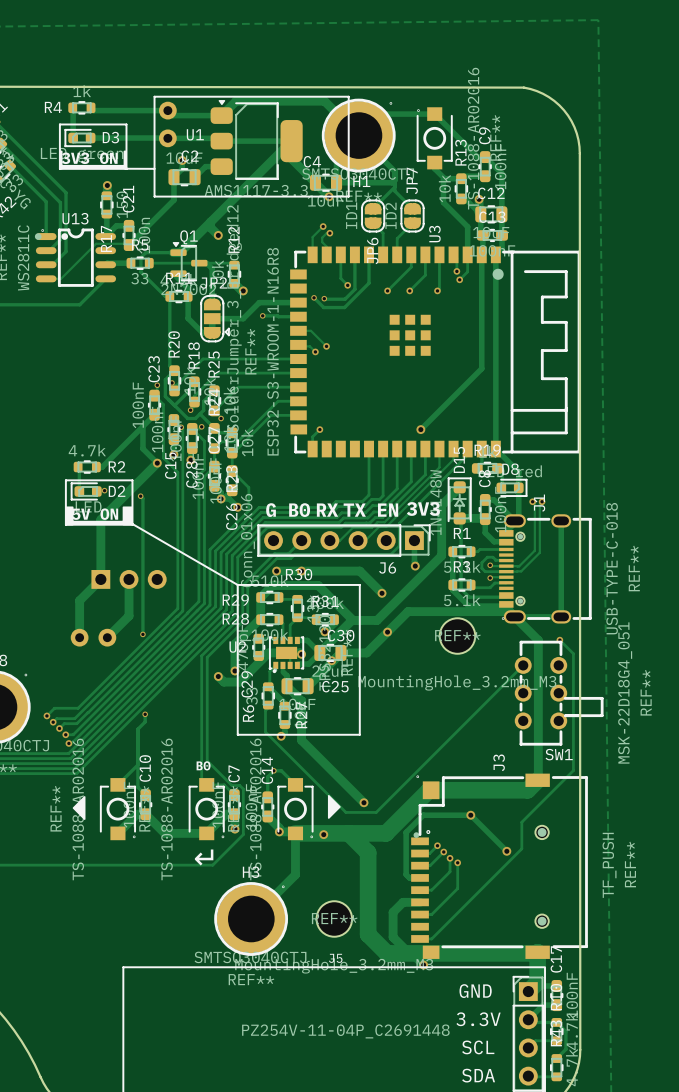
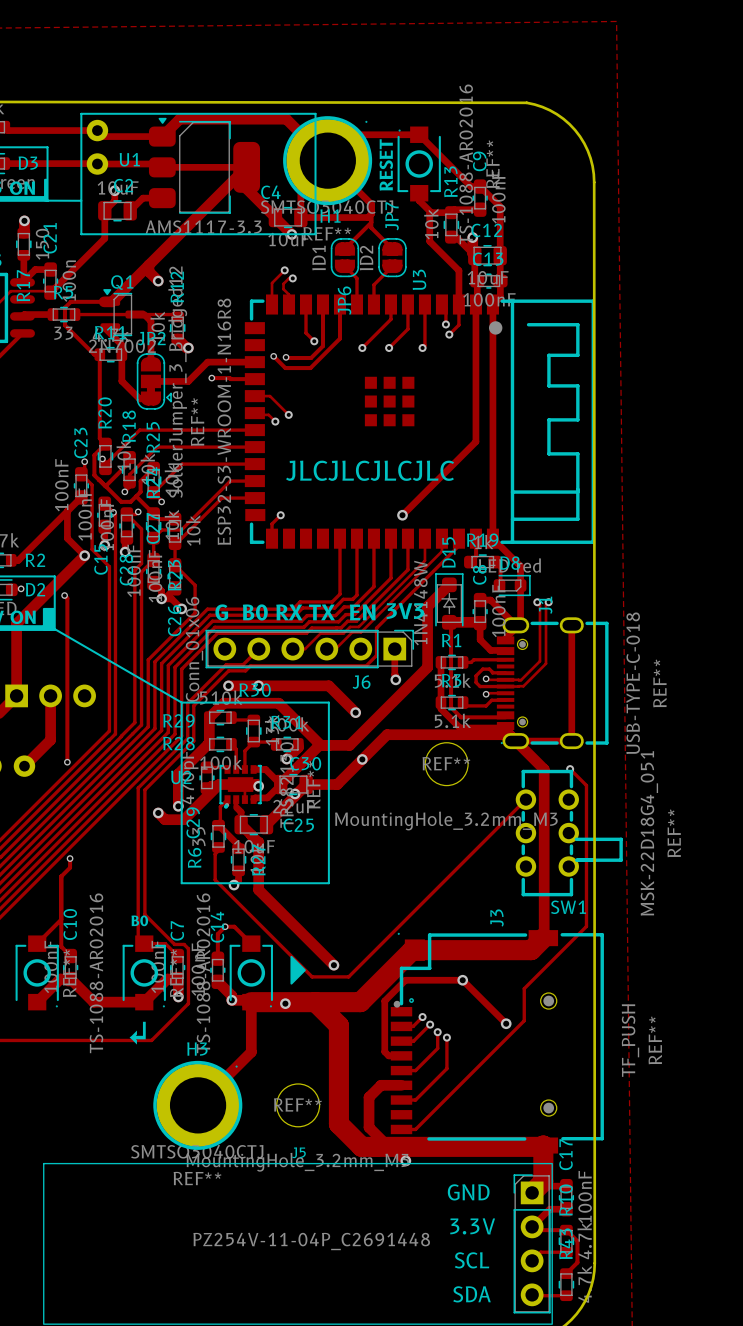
text: none -> RESET (386, 164)
text: none -> JLCJLCJLCJLC (370, 470)

